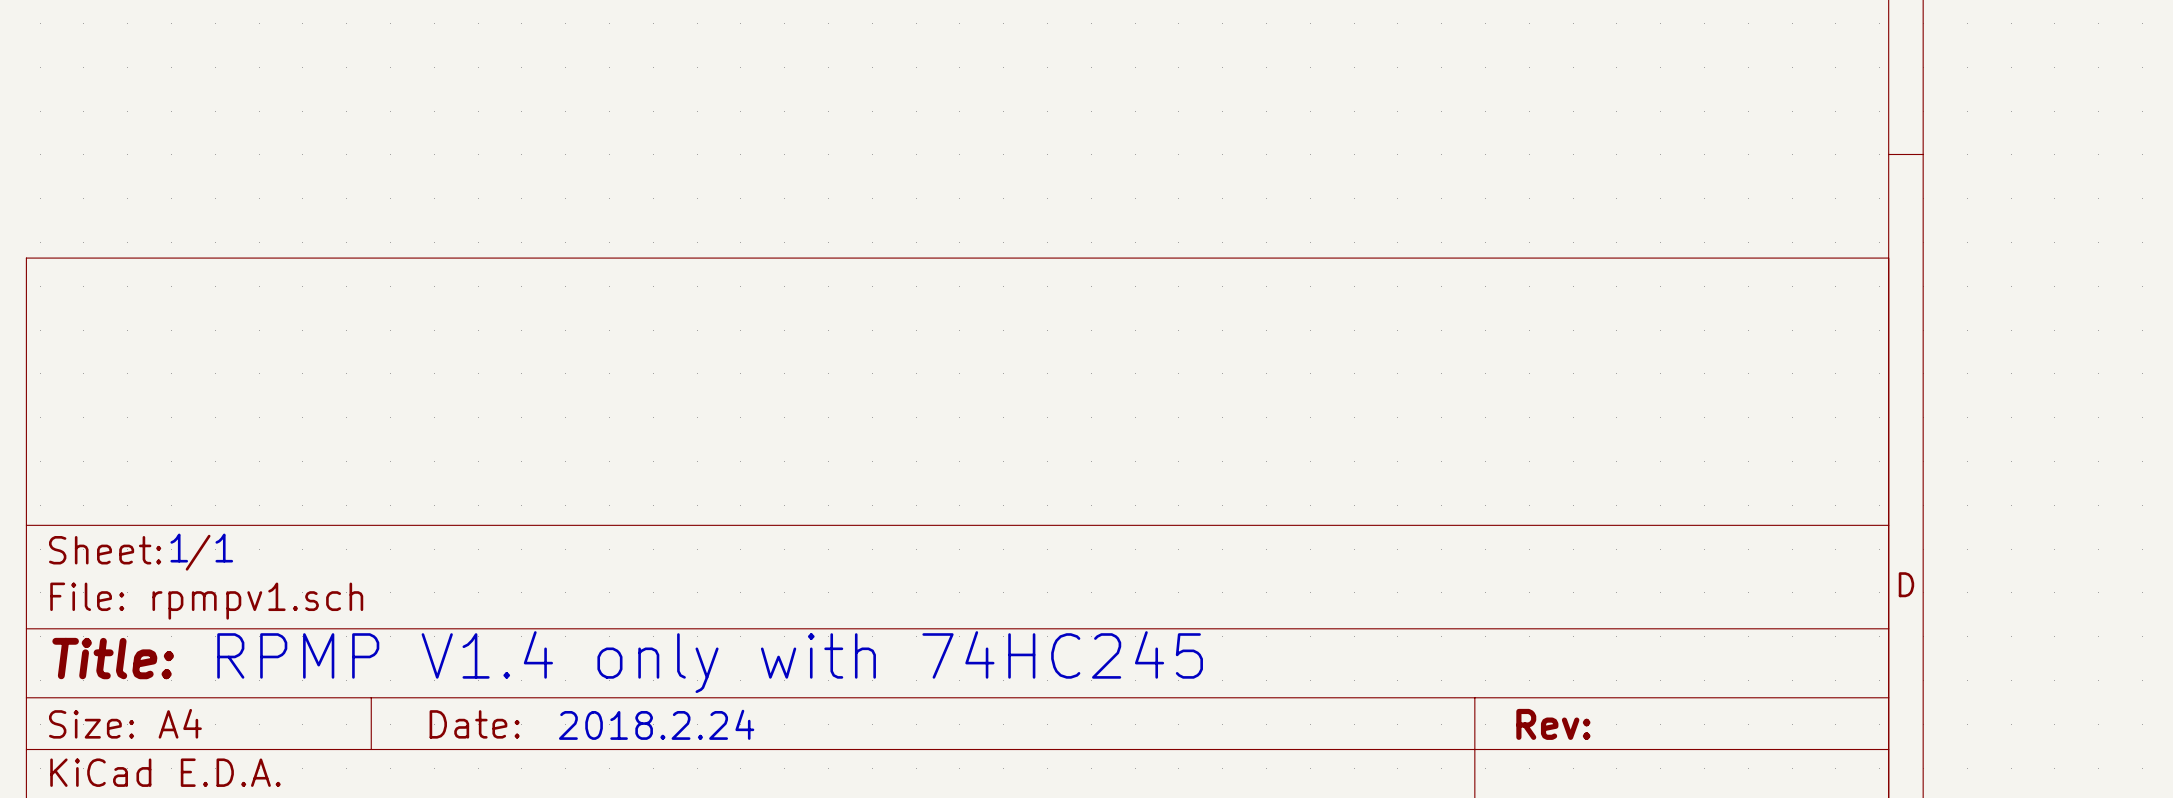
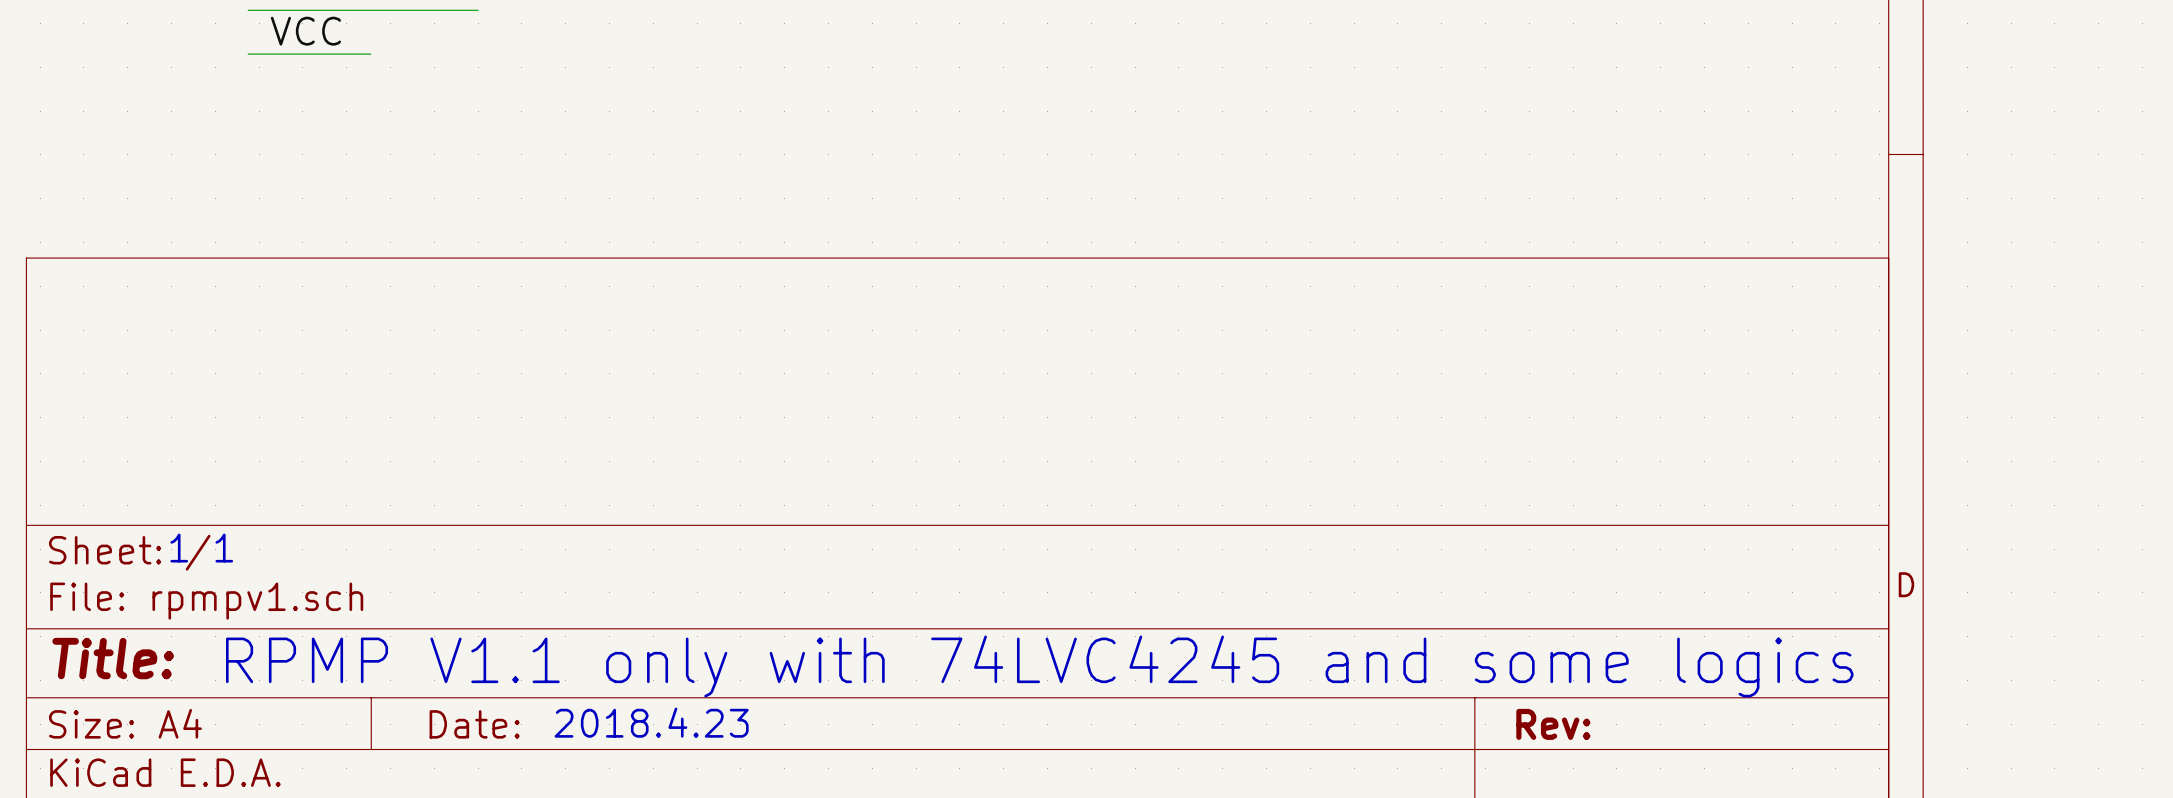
wire: none -> (248, 10) (478, 10)
label: none -> VCC (305, 31)
wire: none -> (248, 54) (370, 54)
text: RPMP V1.4 only with 74HC245 (710, 662) -> RPMP V1.1 only with 74LVC4245 and some logics (1039, 666)
text: 2018.2.24 (656, 724) -> 2018.4.23 (651, 722)

